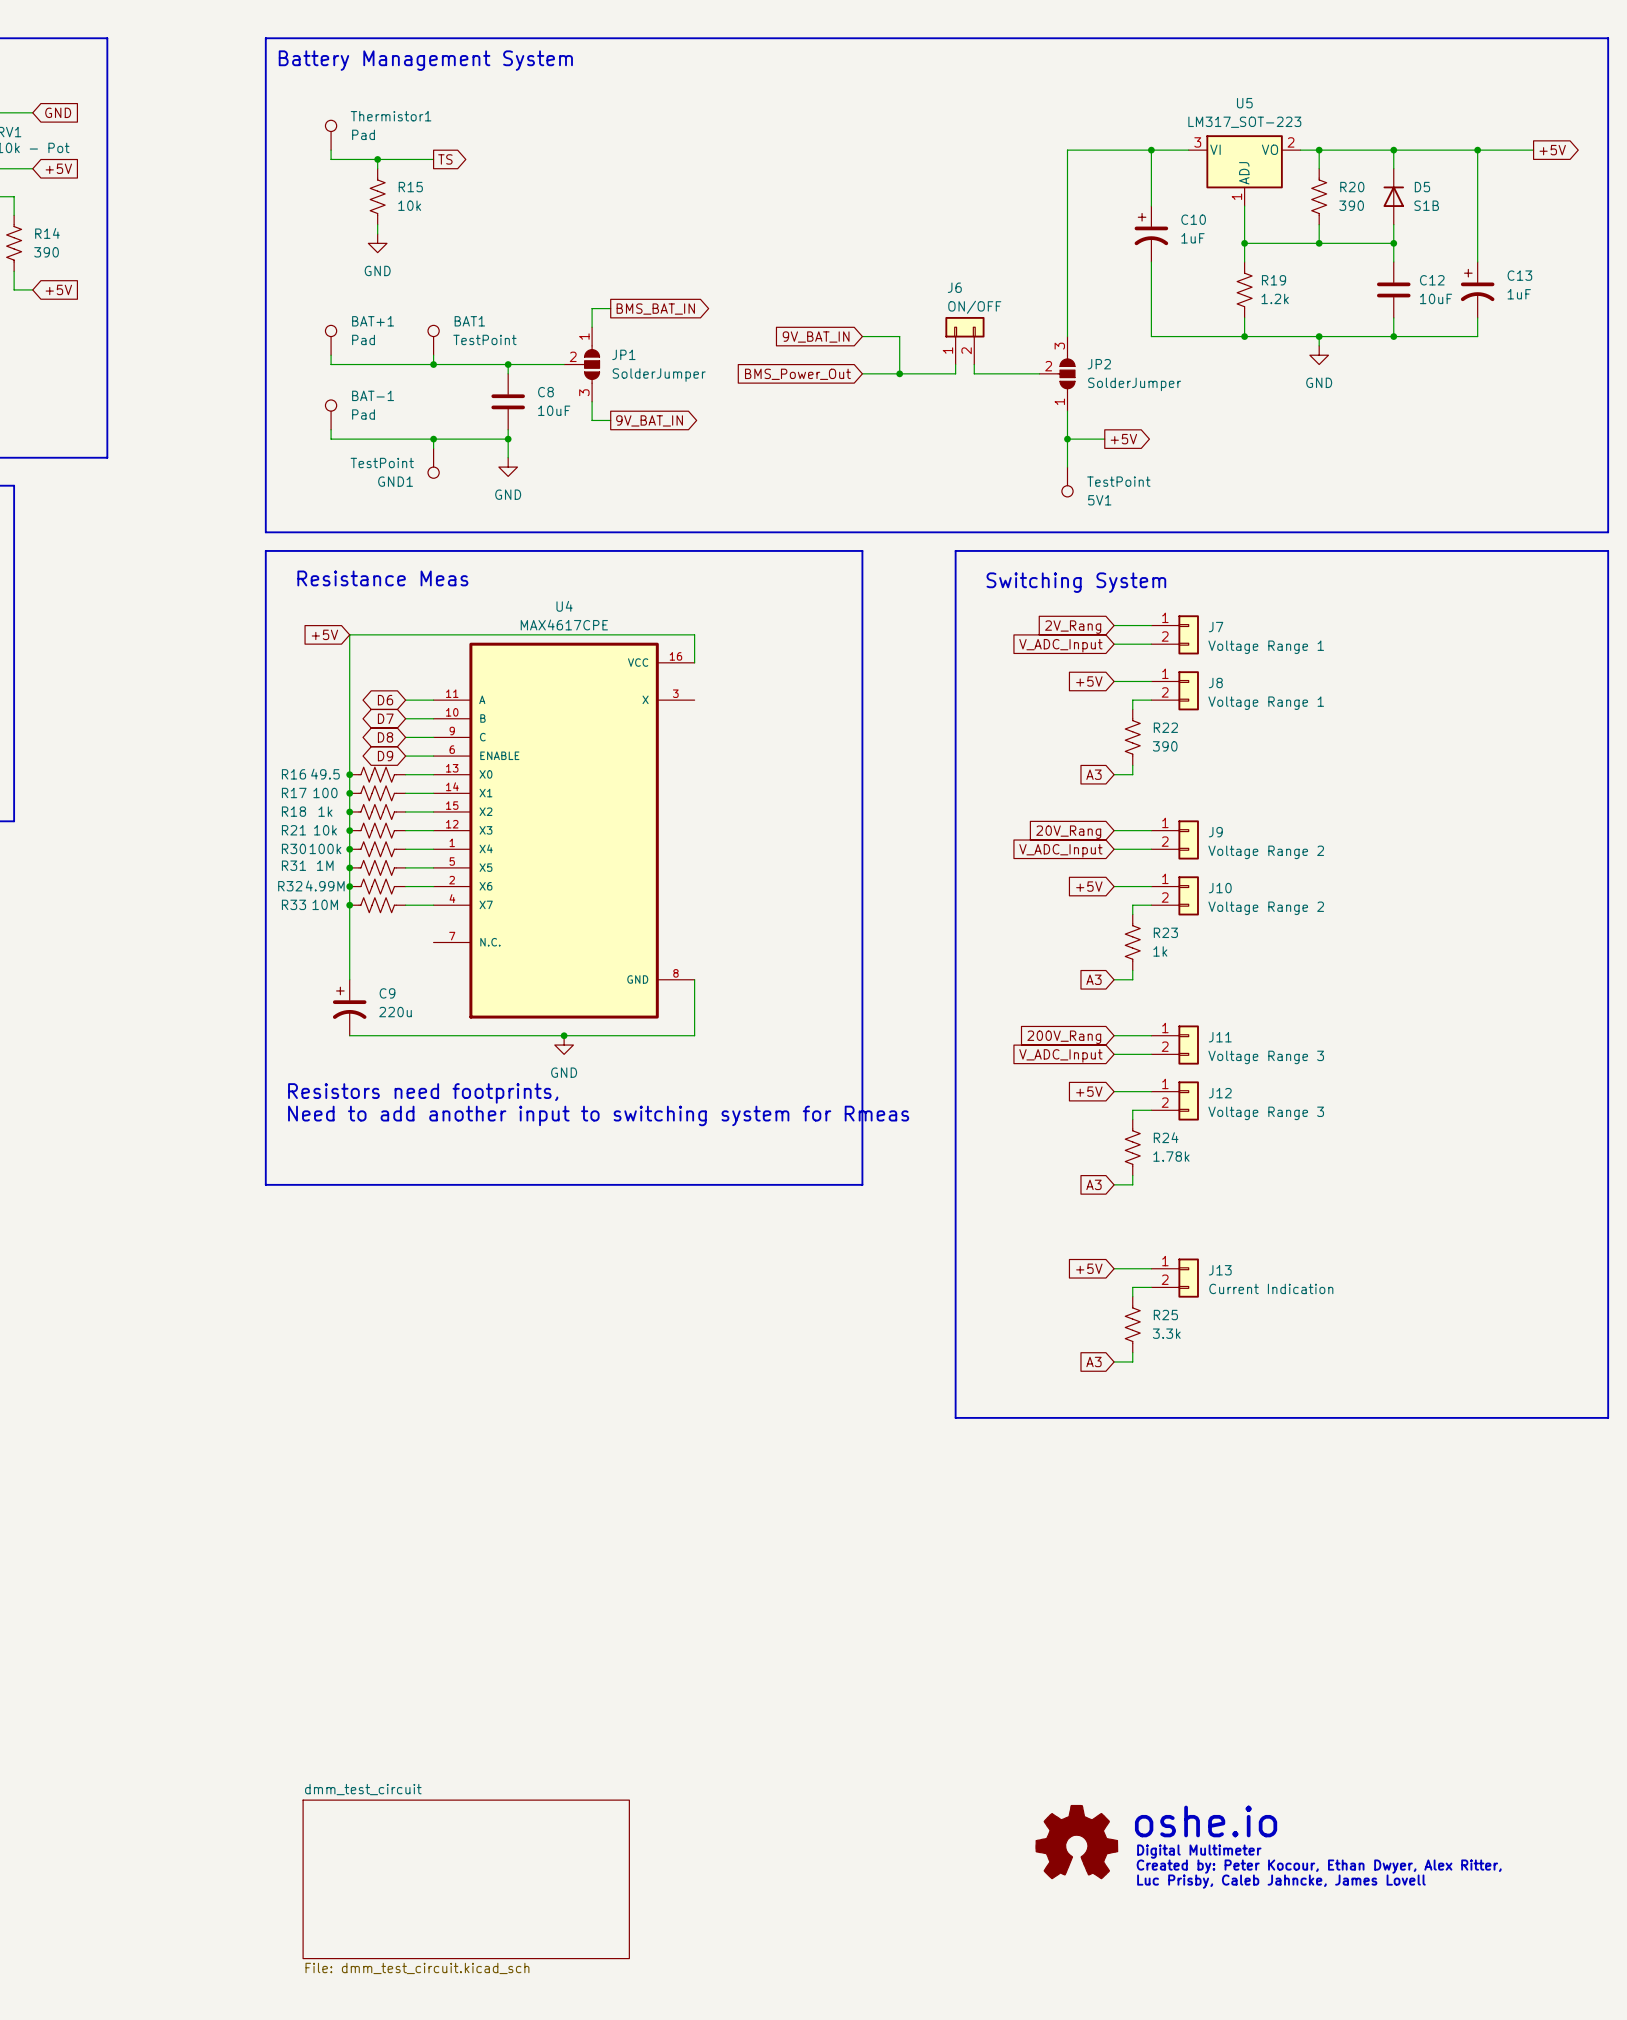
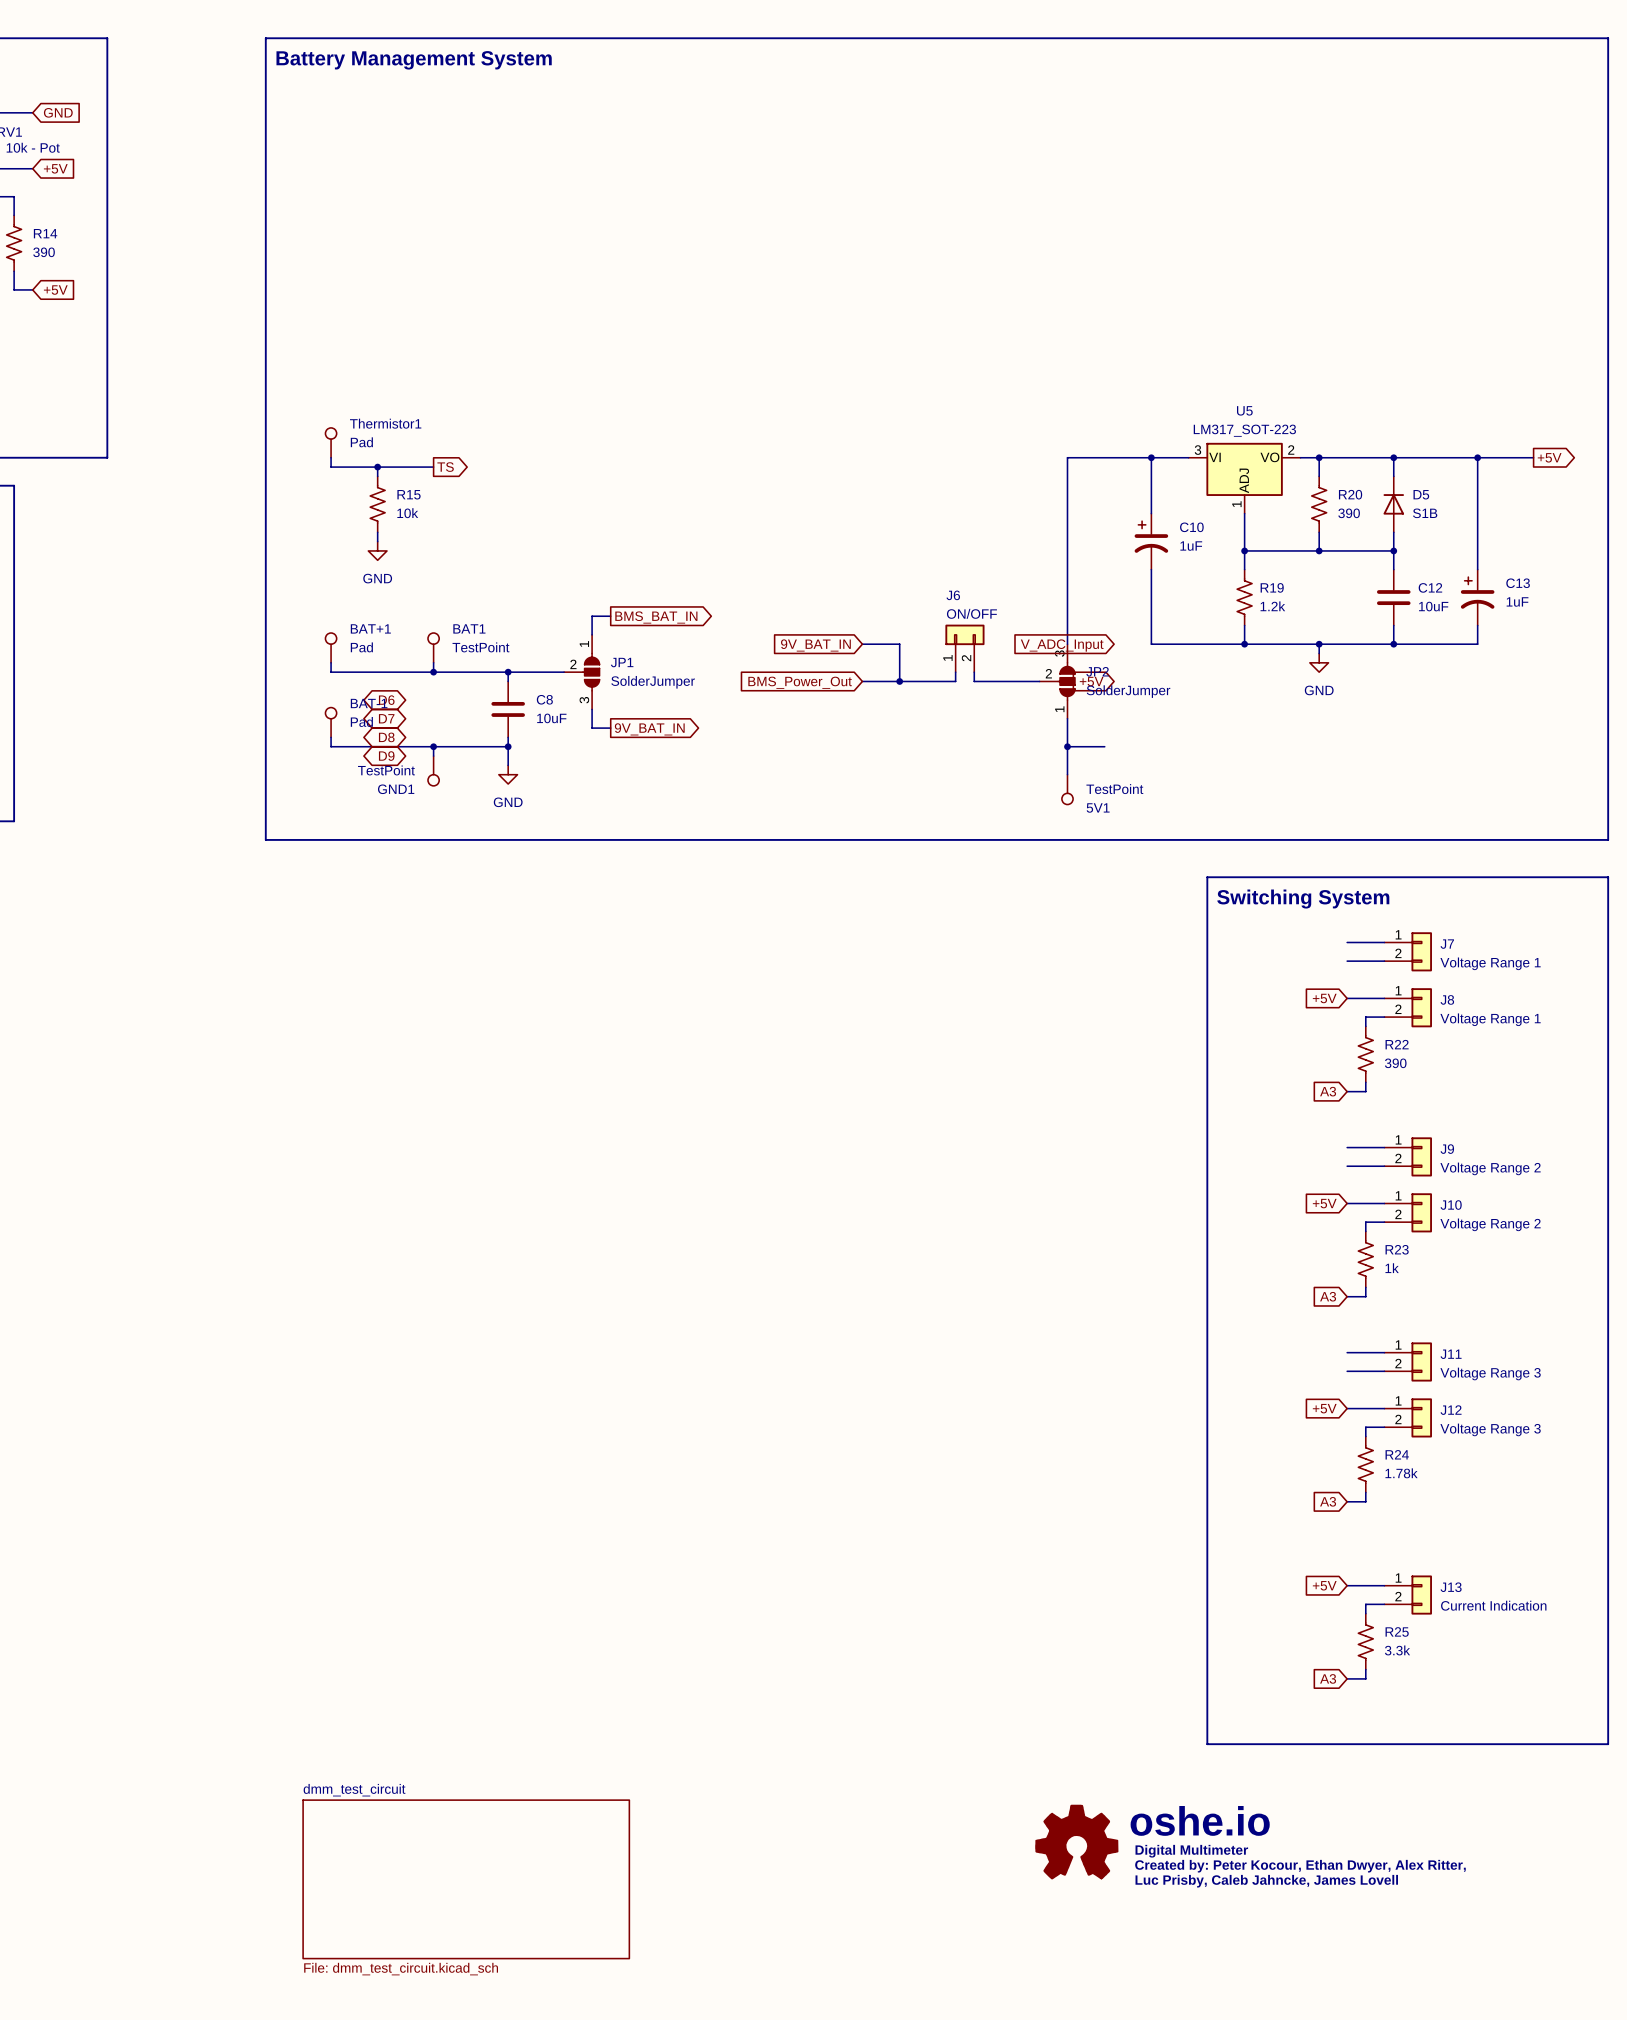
Thermistor1 position: (331, 135) -> (331, 442)
wire: (331, 150) (331, 159) (433, 159) -> none
wire: (1151, 150) (1151, 206) -> none
junction: (1151, 150) -> none
wire: (1188, 150) (1067, 150) (1067, 336) -> none
wire: (1300, 150) (1533, 150) -> none
wire: (1319, 150) (1319, 168) -> none
junction: (1319, 150) -> none
wire: (1393, 150) (1393, 168) -> none
junction: (1393, 150) -> none
wire: (1477, 150) (1477, 261) -> none
junction: (1477, 150) -> none
global label: +5V (1552, 150) -> none
wire: (377, 159) (377, 168) -> none
junction: (377, 159) -> none
global label: TS (445, 159) -> none
U5 position: (1244, 170) -> (1244, 478)
R15 position: (377, 196) -> (377, 504)
R20 position: (1319, 196) -> (1319, 504)
D5 position: (1393, 196) -> (1393, 504)
wire: (1244, 206) (1244, 261) -> none
wire: (377, 224) (377, 234) -> none
wire: (1319, 224) (1319, 243) -> none
wire: (1393, 224) (1393, 261) -> none
C10 position: (1151, 234) -> (1151, 541)
power symbol: GND (377, 243) -> none
wire: (1244, 243) (1393, 243) -> none
junction: (1244, 243) -> none
junction: (1319, 243) -> none
junction: (1393, 243) -> none
wire: (1151, 261) (1151, 336) (1477, 336) (1477, 317) -> none
R19 position: (1244, 289) -> (1244, 597)
C12 position: (1393, 289) -> (1393, 597)
C13 position: (1477, 289) -> (1477, 597)
wire: (610, 308) (592, 308) (592, 327) -> none
global label: BMS_BAT_IN (655, 309) -> none
wire: (1244, 317) (1244, 336) -> (1319, 457) (1319, 476)
wire: (1393, 317) (1393, 336) -> (1393, 457) (1393, 476)
wire: (862, 336) (899, 336) (899, 373) -> none
junction: (1244, 336) -> none
wire: (1319, 336) (1319, 345) -> none
junction: (1319, 336) -> none
junction: (1393, 336) -> none
global label: 9V_BAT_IN (816, 337) -> none
BAT+1 position: (331, 340) -> (331, 647)
BAT1 position: (433, 340) -> (433, 647)
J6 position: (964, 340) -> (964, 648)
wire: (331, 355) (331, 364) (564, 364) -> none
wire: (433, 355) (433, 364) -> none
power symbol: GND (1319, 355) -> none
junction: (433, 364) -> none
wire: (508, 364) (508, 373) -> none
junction: (508, 364) -> none
JP1 position: (581, 364) -> (581, 672)
wire: (955, 364) (955, 373) (862, 373) -> none
wire: (974, 364) (974, 373) (1039, 373) -> none
junction: (899, 373) -> none
JP2 position: (1057, 373) -> (1057, 681)
global label: BMS_Power_Out (797, 374) -> none
C8 position: (508, 401) -> (508, 709)
wire: (592, 401) (592, 420) (610, 420) -> none
wire: (1067, 411) (1067, 457) -> (1188, 457) (1067, 457)
BAT-1 position: (331, 414) -> (331, 722)
global label: 9V_BAT_IN (649, 420) -> none
wire: (331, 429) (331, 439) (508, 439) -> none
wire: (508, 429) (508, 457) -> none
wire: (433, 439) (433, 448) -> (377, 467) (377, 476)
junction: (433, 439) -> none
junction: (508, 439) -> none
wire: (1067, 439) (1104, 439) -> none
junction: (1067, 439) -> none
global label: +5V (1123, 439) -> none
wire: none -> (331, 457) (331, 467) (433, 467)
wire: none -> (1151, 457) (1151, 513)
junction: none -> (1151, 457)
wire: none -> (1300, 457) (1533, 457)
junction: none -> (1319, 457)
junction: none -> (1393, 457)
wire: none -> (1477, 457) (1477, 569)
junction: none -> (1477, 457)
global label: none -> +5V (1549, 457)
GND1 position: (433, 463) -> (433, 770)
junction: none -> (377, 467)
global label: none -> TS (445, 467)
power symbol: GND (508, 467) -> none
wire: none -> (1067, 467) (1067, 644)
5V1 position: (1067, 481) -> (1067, 789)
wire: none -> (1244, 513) (1244, 569)
line: (265, 532) (1608, 532) -> (1608, 550) (1608, 532)
wire: none -> (377, 532) (377, 541)
wire: none -> (1319, 532) (1319, 550)
wire: none -> (1393, 532) (1393, 569)
line: (265, 550) (862, 550) (862, 1184) (265, 1184) (265, 839) -> (265, 550) (265, 532)
power symbol: none -> GND (377, 550)
junction: none -> (1244, 550)
junction: none -> (1319, 550)
junction: none -> (1393, 550)
line: (1608, 550) (955, 550) (955, 1417) (1608, 1417) -> (1608, 877) (1207, 877) (1207, 1744) (1608, 1744) (1608, 1417)
wire: none -> (1151, 569) (1151, 644) (1477, 644) (1477, 625)
text: Resistance Meas (382, 578) -> none
text: Switching System (1076, 582) -> none
wire: none -> (610, 616) (592, 616) (592, 634)
global label: none -> BMS_BAT_IN (656, 617)
wire: (1114, 625) (1151, 625) -> none
wire: none -> (1244, 625) (1244, 644)
wire: none -> (1393, 625) (1393, 644)
global label: 2V_Rang (1073, 627) -> none
global label: +5V (324, 634) -> none
J7 position: (1175, 634) -> (1408, 951)
global label: none -> 9V_BAT_IN (815, 645)
wire: none -> (862, 644) (899, 644) (899, 681)
wire: (1114, 644) (1151, 644) -> none
junction: none -> (1244, 644)
wire: none -> (1319, 644) (1319, 653)
junction: none -> (1319, 644)
junction: none -> (1393, 644)
wire: none -> (331, 662) (331, 672) (564, 672)
wire: none -> (433, 662) (433, 672)
wire: (694, 662) (694, 634) (349, 634) (349, 979) -> none
power symbol: none -> GND (1319, 662)
junction: none -> (433, 672)
junction: none -> (508, 672)
wire: none -> (955, 672) (955, 681) (862, 681)
wire: none -> (974, 672) (974, 681) (1039, 681)
global label: none -> BMS_Power_Out (800, 682)
junction: none -> (899, 681)
wire: (1114, 681) (1151, 681) -> (1067, 746) (1104, 746)
J8 position: (1175, 690) -> (1408, 1007)
wire: (405, 700) (433, 700) -> none
wire: (1151, 700) (1132, 700) (1132, 709) -> none
wire: (405, 718) (433, 718) -> none
wire: none -> (1067, 718) (1067, 774)
global label: none -> 9V_BAT_IN (649, 729)
wire: none -> (331, 737) (331, 746) (508, 746)
wire: (405, 737) (433, 737) -> none
R22 position: (1132, 737) -> (1365, 1054)
junction: none -> (433, 746)
junction: none -> (508, 746)
junction: none -> (1067, 746)
wire: (405, 756) (433, 756) -> (433, 746) (433, 756)
wire: (1132, 765) (1132, 774) (1114, 774) -> none
junction: (349, 774) -> none
R16: 49.5 (377, 774) -> none
wire: (405, 774) (433, 774) -> none
power symbol: none -> GND (508, 774)
global label: A3 (1094, 774) -> none
junction: (349, 793) -> none
R17: 100 (377, 793) -> none
wire: (405, 793) (433, 793) -> none
junction: (349, 811) -> none
R18: 1k (377, 811) -> none
wire: (405, 811) (433, 811) -> none
junction: (349, 830) -> none
R21: 10k (377, 830) -> none
wire: (405, 830) (433, 830) -> none
U4: MAX4617CPE (564, 830) -> none
wire: (1114, 830) (1151, 830) -> none
global label: 20V_Rang (1068, 832) -> none
J9 position: (1175, 839) -> (1408, 1156)
line: (1608, 839) (1608, 877) -> (1608, 839) (265, 839)
junction: (349, 849) -> none
R30: 100k (377, 849) -> none
wire: (405, 849) (433, 849) -> none
wire: (1114, 849) (1151, 849) -> none
global label: V_ADC_Input (1060, 850) -> none
junction: (349, 867) -> none
R31: 1M (377, 867) -> none
wire: (405, 867) (433, 867) -> none
junction: (349, 886) -> none
R32: 4.99M (377, 886) -> none
wire: (405, 886) (433, 886) -> none
global label: +5V (1089, 886) -> none
wire: (1114, 886) (1151, 886) -> none
J10 position: (1175, 895) -> (1408, 1212)
text: none -> Switching System (1303, 899)
junction: (349, 905) -> none
R33: 10M (377, 905) -> none
wire: (405, 905) (433, 905) -> none
wire: (1151, 905) (1132, 905) (1132, 914) -> none
R23 position: (1132, 942) -> (1365, 1259)
wire: none -> (1347, 942) (1384, 942)
wire: none -> (1347, 961) (1384, 961)
wire: (1132, 970) (1132, 979) (1114, 979) -> none
wire: (694, 979) (694, 1035) (349, 1035) -> none
global label: A3 (1094, 979) -> none
global label: none -> +5V (1324, 998)
wire: none -> (1347, 998) (1384, 998)
C9: 220u (349, 1007) -> none
wire: none -> (1384, 1017) (1365, 1017) (1365, 1026)
junction: (564, 1035) -> none
wire: (1114, 1035) (1151, 1035) -> none
global label: 200V_Rang (1064, 1037) -> none
power symbol: GND (564, 1045) -> none
J11 position: (1175, 1045) -> (1408, 1361)
wire: (1114, 1054) (1151, 1054) -> none
global label: V_ADC_Input (1060, 1055) -> none
wire: none -> (1365, 1082) (1365, 1091) (1347, 1091)
global label: +5V (1089, 1091) -> none
wire: (1114, 1091) (1151, 1091) -> none
global label: none -> A3 (1328, 1091)
text: Resistors need footprints, (423, 1093) -> none
J12 position: (1175, 1100) -> (1408, 1417)
wire: (1151, 1110) (1132, 1110) (1132, 1119) -> none
text: Need to add another input to switching system for Rmeas (598, 1115) -> none
R24 position: (1132, 1147) -> (1365, 1464)
wire: none -> (1347, 1147) (1384, 1147)
wire: none -> (1347, 1166) (1384, 1166)
wire: (1132, 1175) (1132, 1184) (1114, 1184) -> none
global label: A3 (1094, 1184) -> none
global label: none -> +5V (1324, 1203)
wire: none -> (1347, 1203) (1384, 1203)
wire: none -> (1384, 1222) (1365, 1222) (1365, 1231)
global label: +5V (1089, 1268) -> none
wire: (1114, 1268) (1151, 1268) -> none
J13 position: (1175, 1278) -> (1408, 1595)
wire: (1151, 1287) (1132, 1287) (1132, 1296) -> none
wire: none -> (1365, 1287) (1365, 1296) (1347, 1296)
global label: none -> A3 (1328, 1296)
R25 position: (1132, 1324) -> (1365, 1641)
wire: (1132, 1352) (1132, 1361) (1114, 1361) -> none
wire: none -> (1347, 1352) (1384, 1352)
global label: A3 (1094, 1361) -> none
wire: none -> (1347, 1371) (1384, 1371)
global label: none -> +5V (1324, 1408)
wire: none -> (1347, 1408) (1384, 1408)
wire: none -> (1384, 1427) (1365, 1427) (1365, 1436)
wire: none -> (1365, 1492) (1365, 1501) (1347, 1501)
global label: none -> A3 (1328, 1501)
global label: none -> +5V (1324, 1585)
wire: none -> (1347, 1585) (1384, 1585)
wire: none -> (1384, 1604) (1365, 1604) (1365, 1613)
wire: none -> (1365, 1669) (1365, 1678) (1347, 1678)
global label: none -> A3 (1328, 1678)

